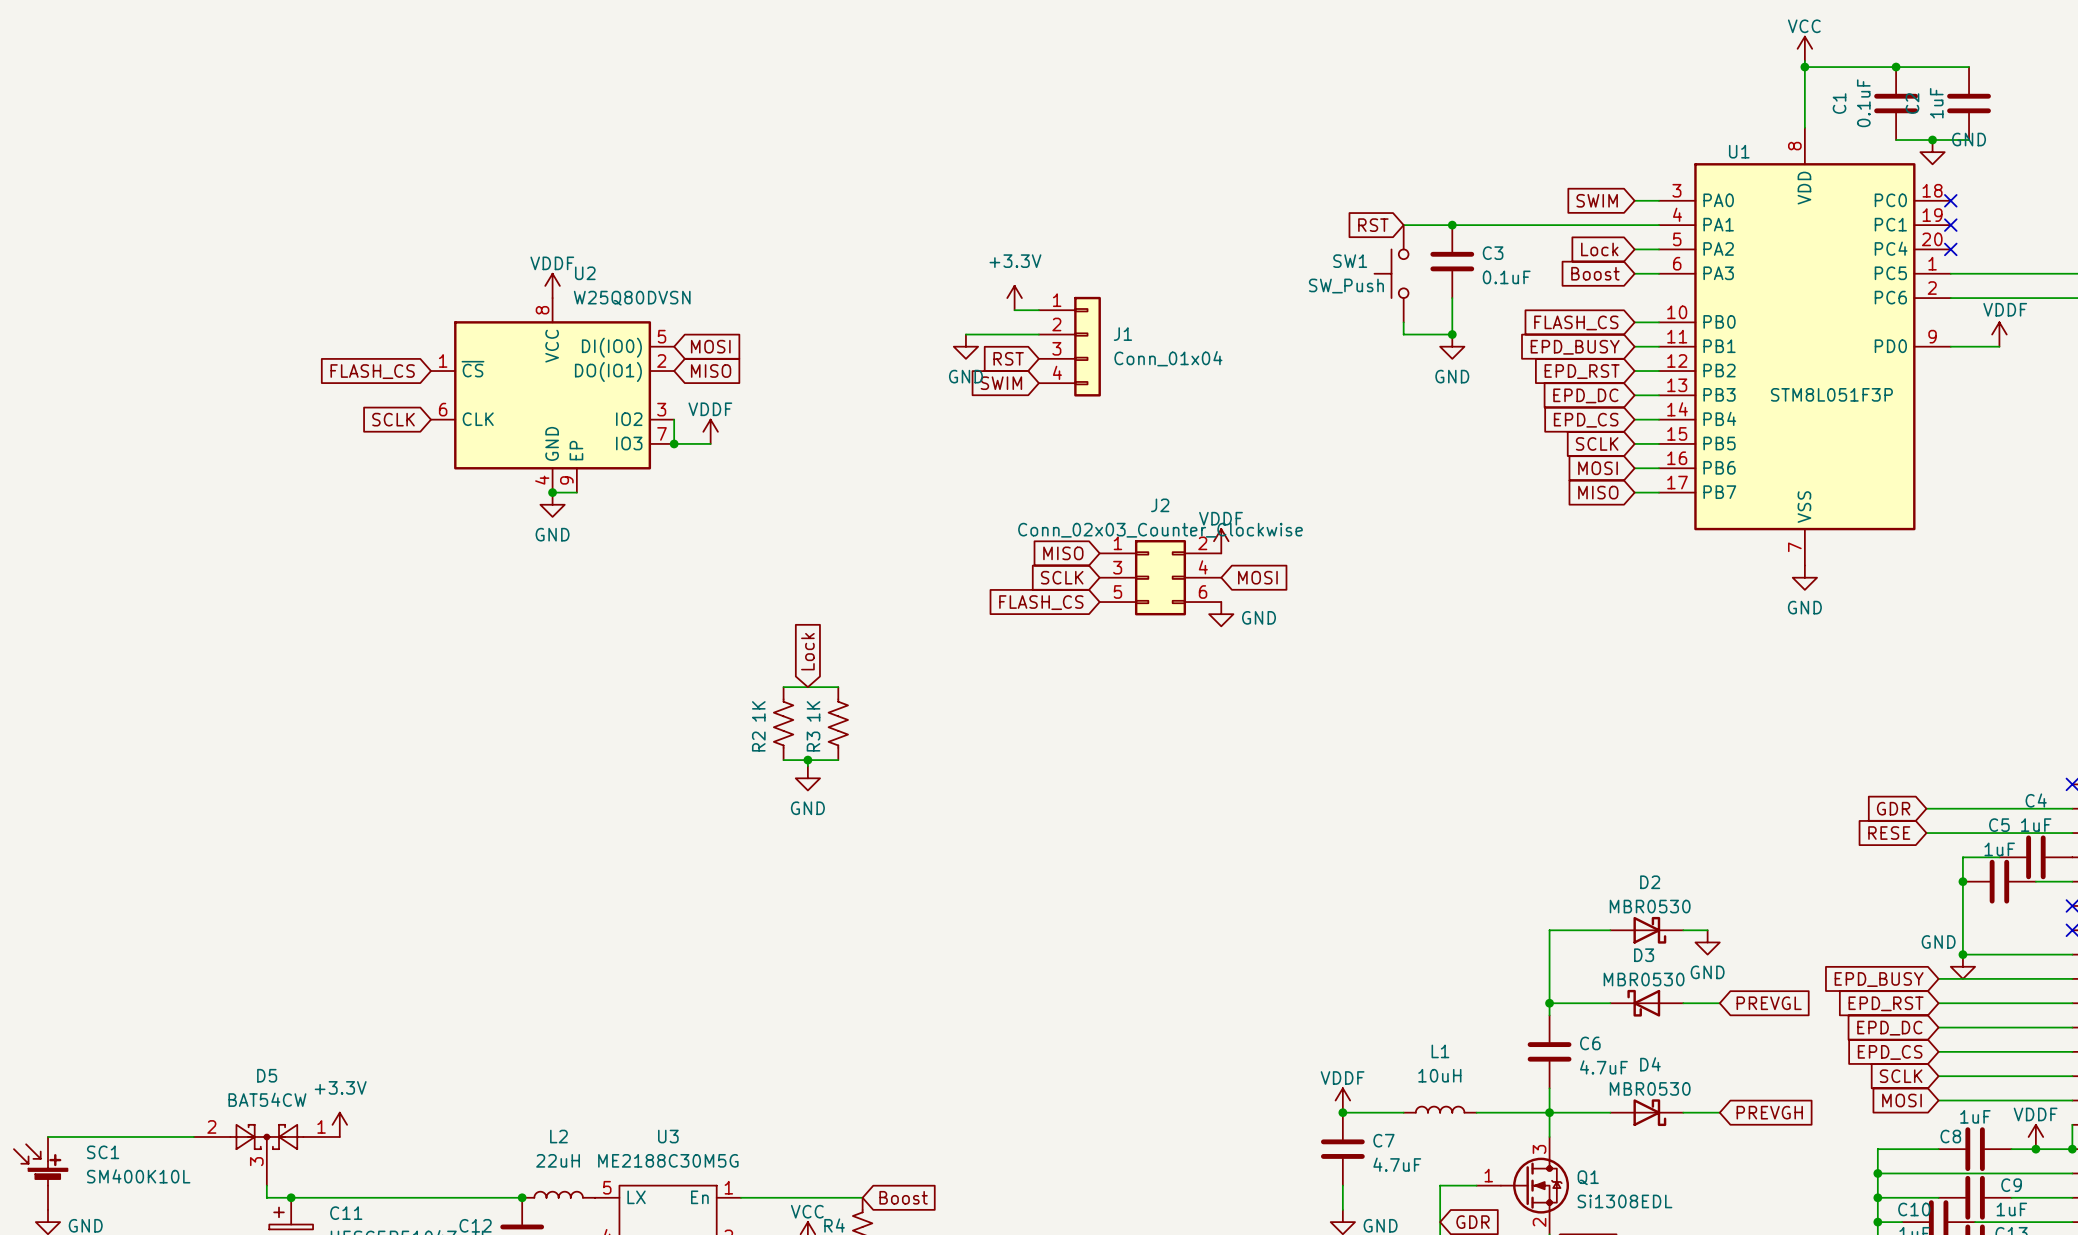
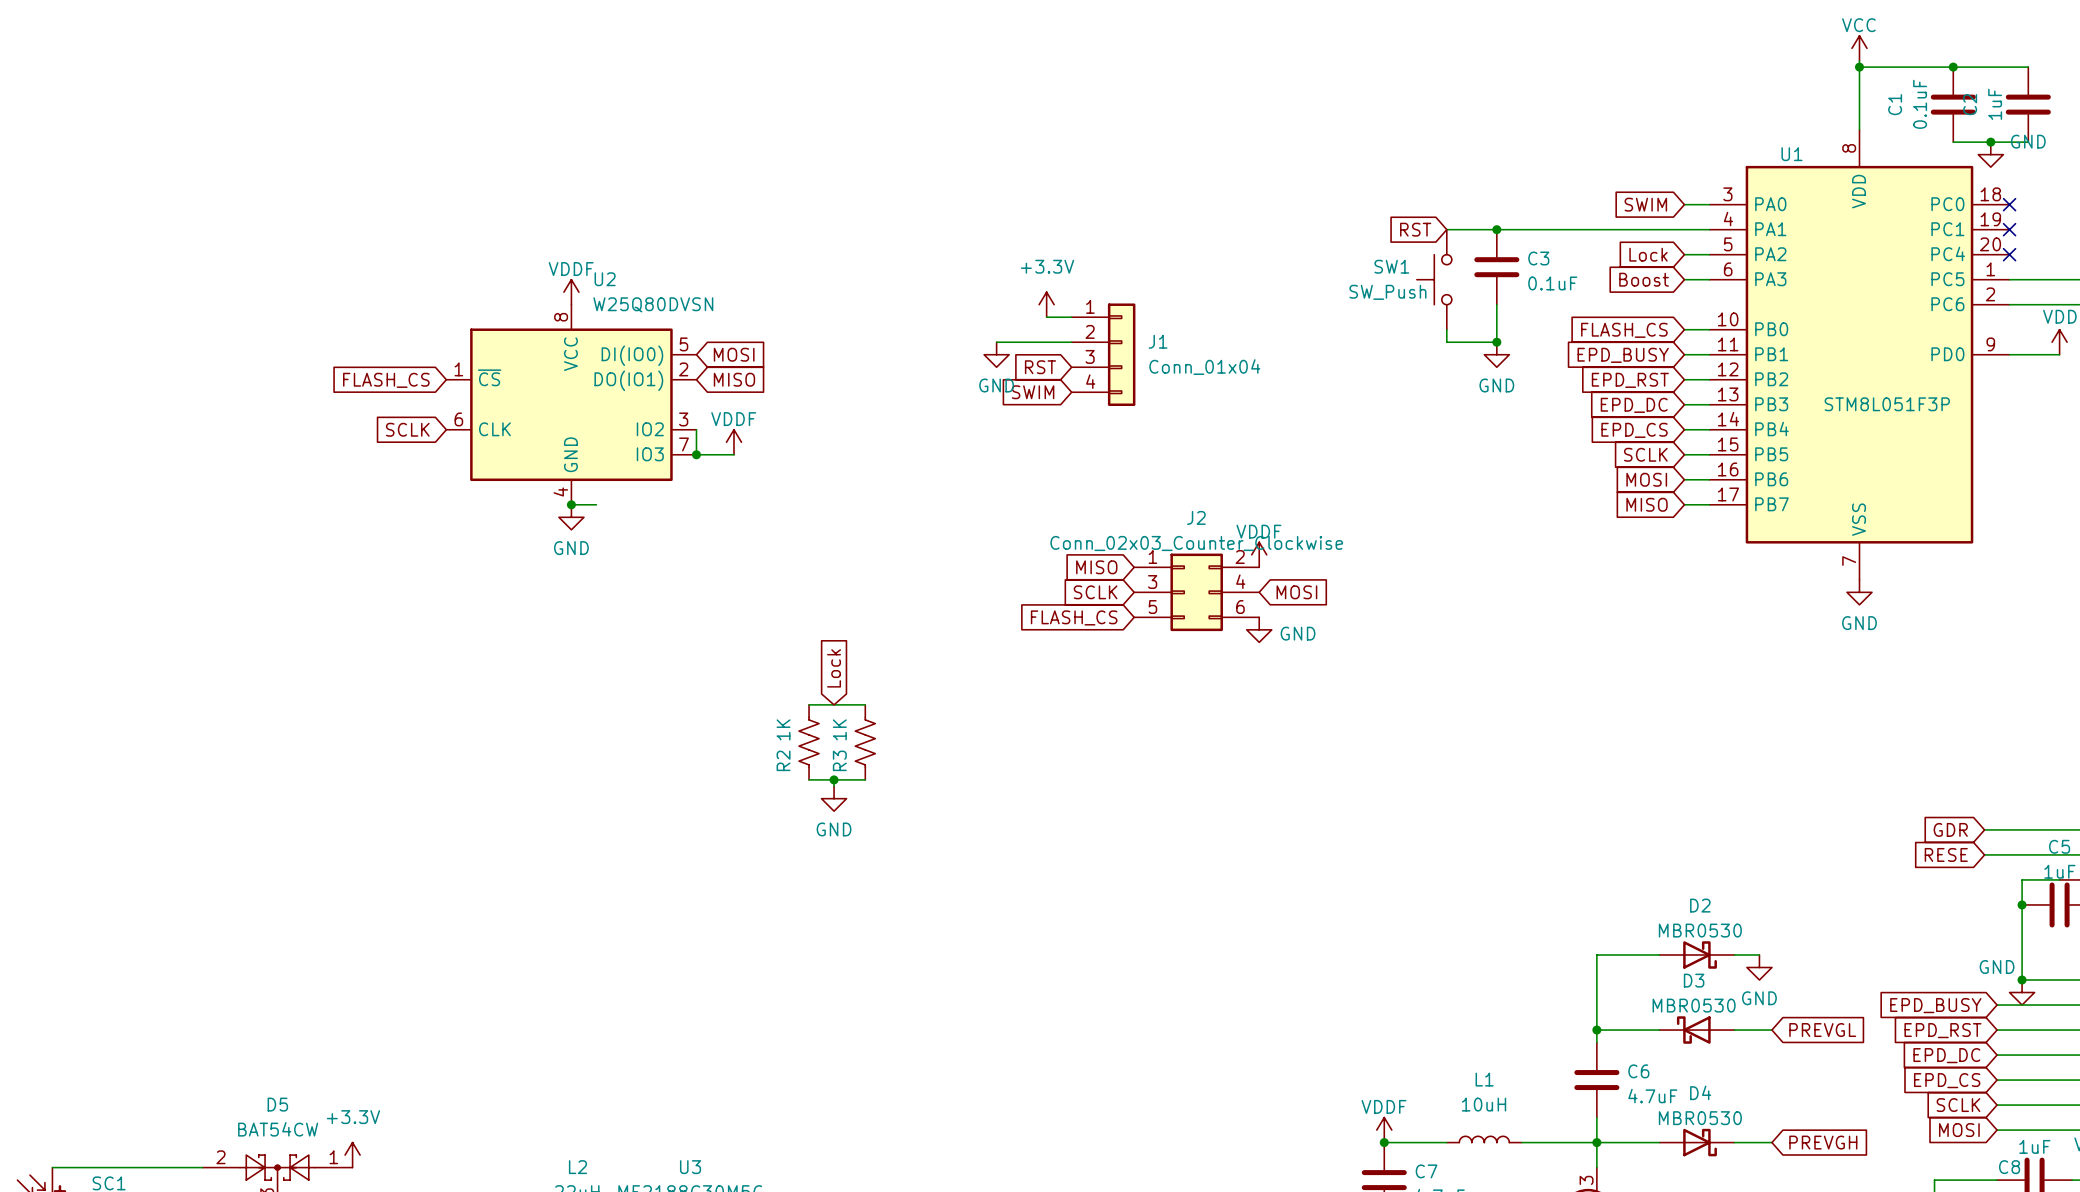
U2 symbol: [430, 298, 675, 493] -> [446, 304, 697, 505]

